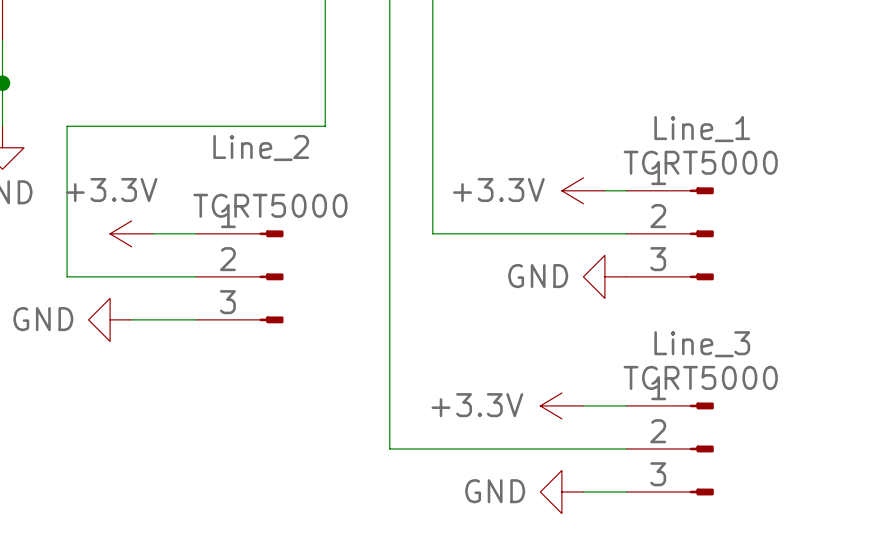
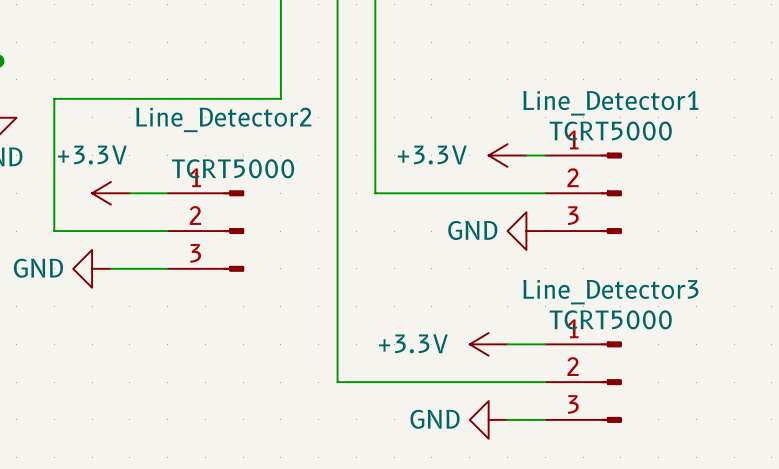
Line_1 name: Line_1 (702, 129) -> Line_Detector1 (610, 103)
Line_2 name: Line_2 (261, 148) -> Line_Detector2 (223, 119)
Line_3 name: Line_3 (702, 344) -> Line_Detector3 (610, 292)

